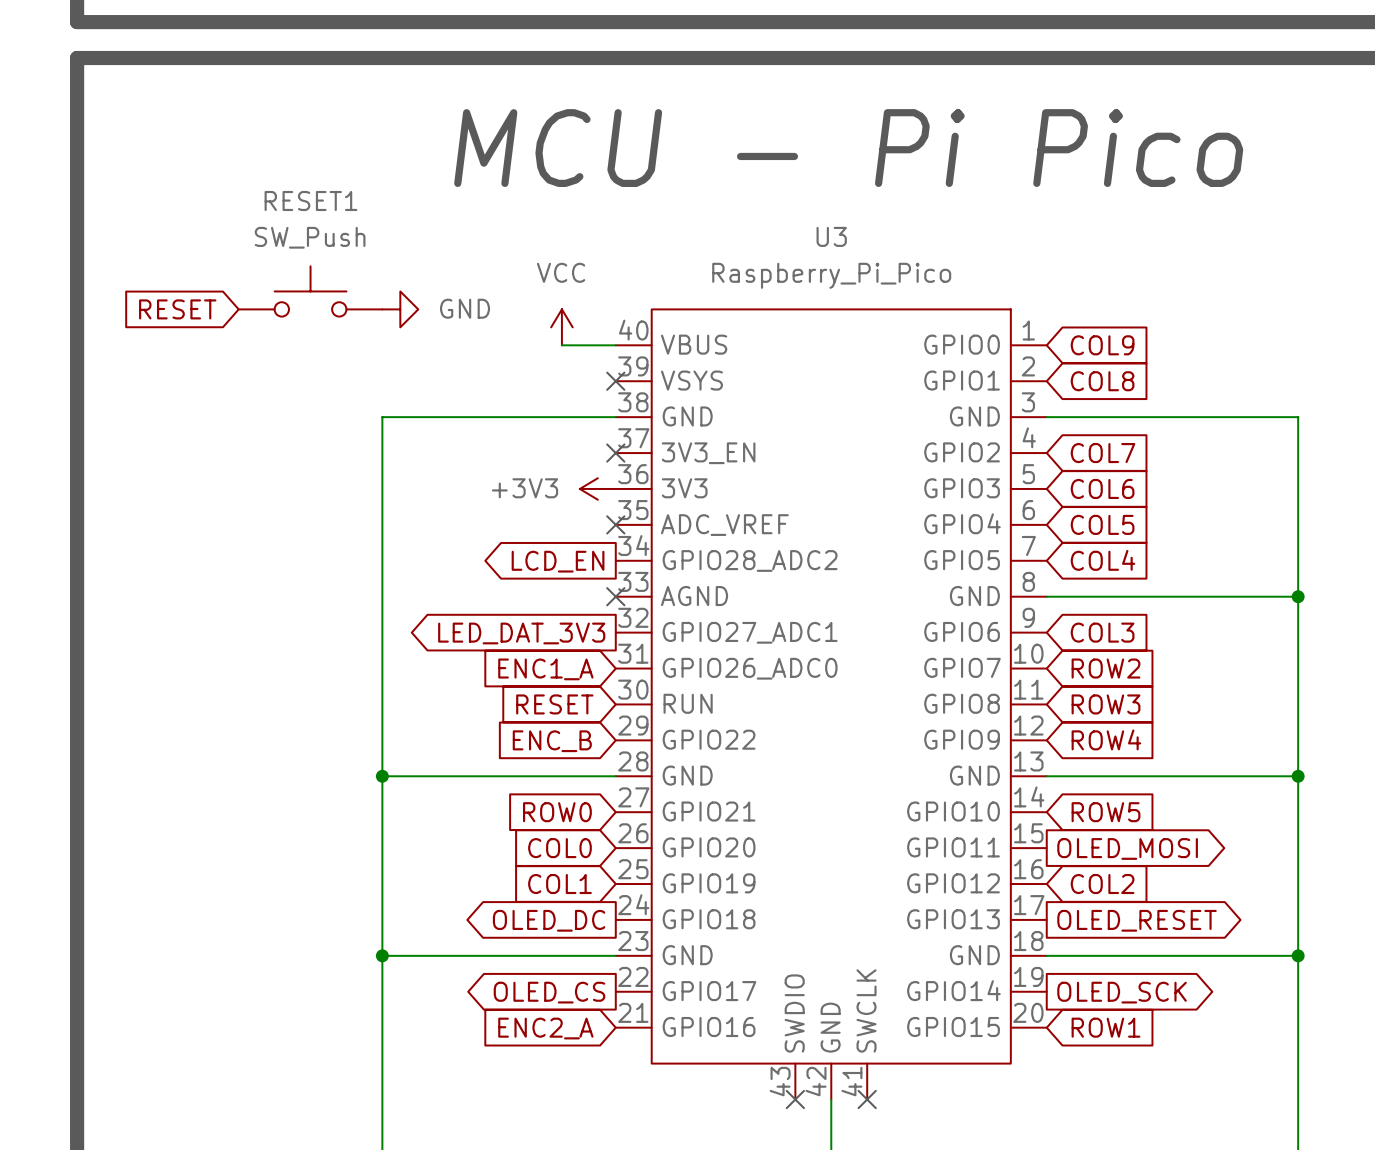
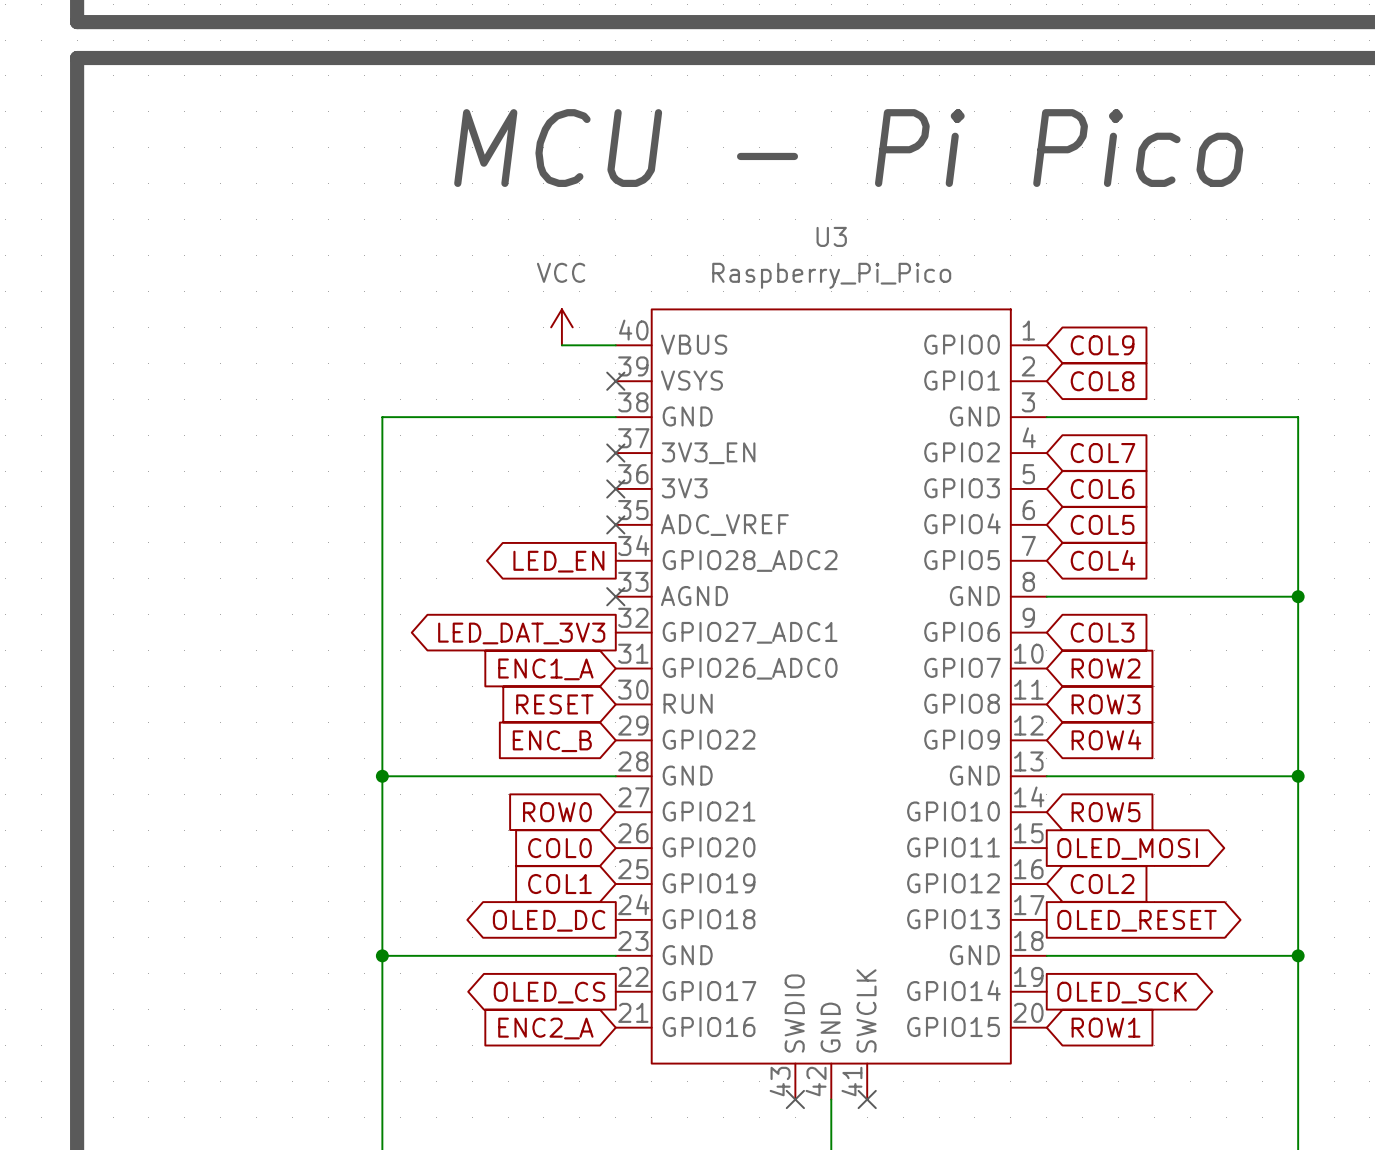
RESET1: SW_Push (310, 291) -> none
global label: RESET (177, 309) -> none
power symbol: GND (400, 309) -> none
power symbol: +3V3 (597, 488) -> none
no-connect mark: none -> (615, 488)
global label: LCD_EN (558, 561) -> LED_EN (558, 561)

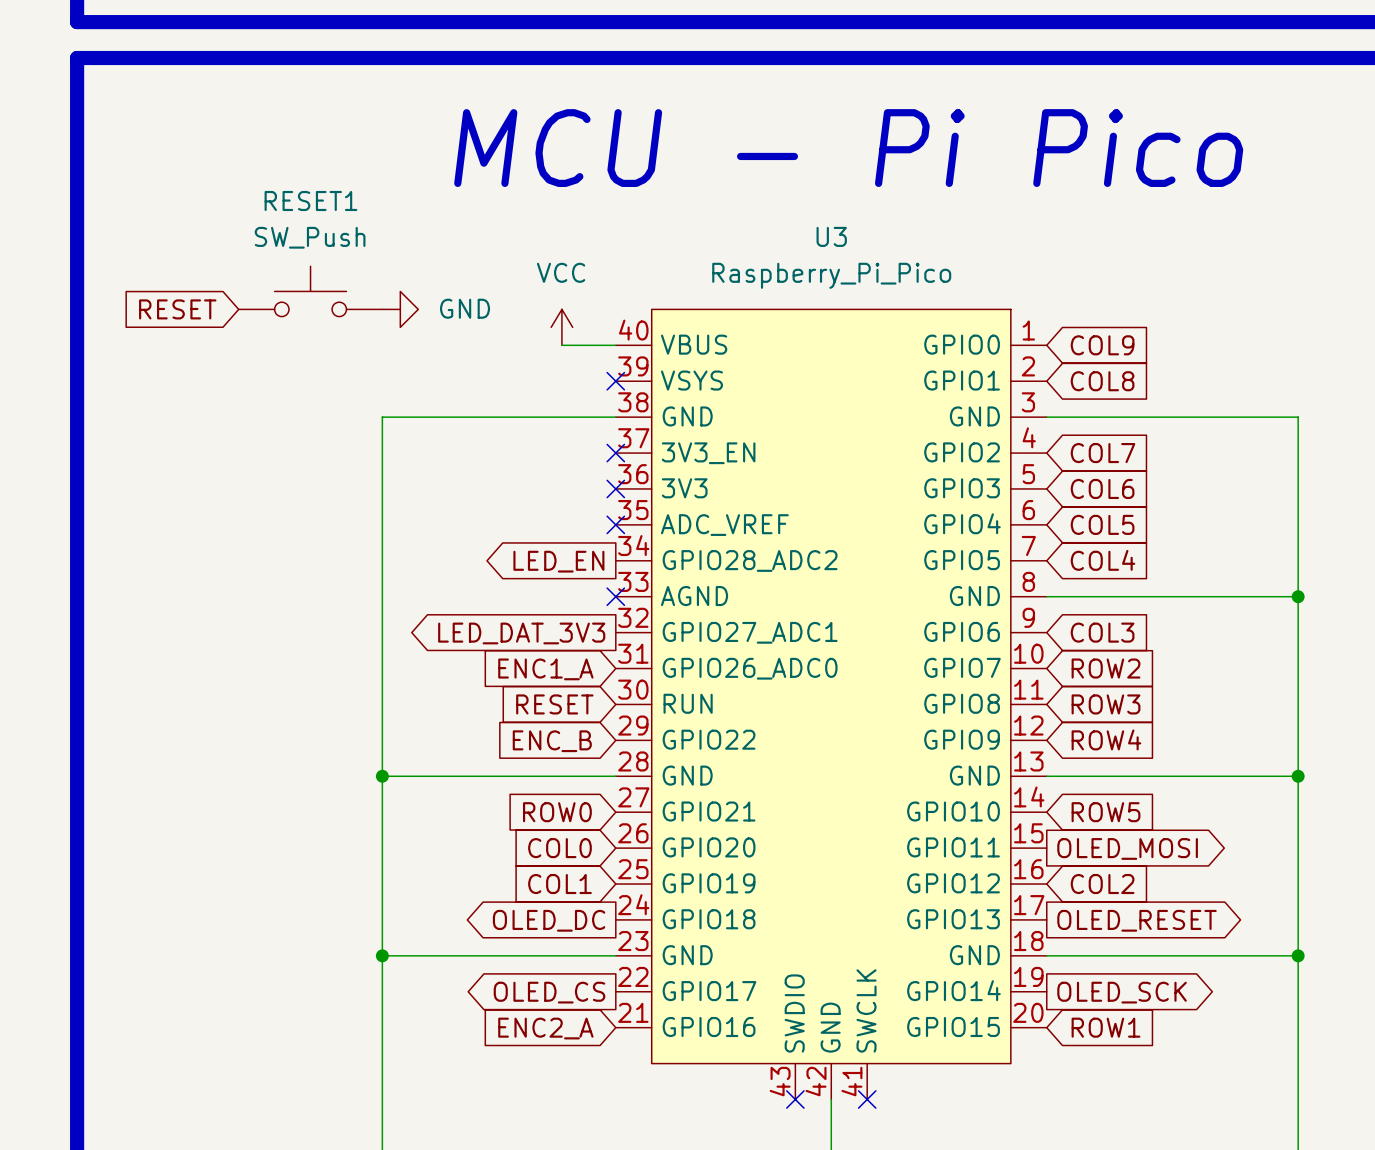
RESET1: none -> SW_Push (310, 291)
global label: none -> RESET (177, 309)
power symbol: none -> GND (400, 309)

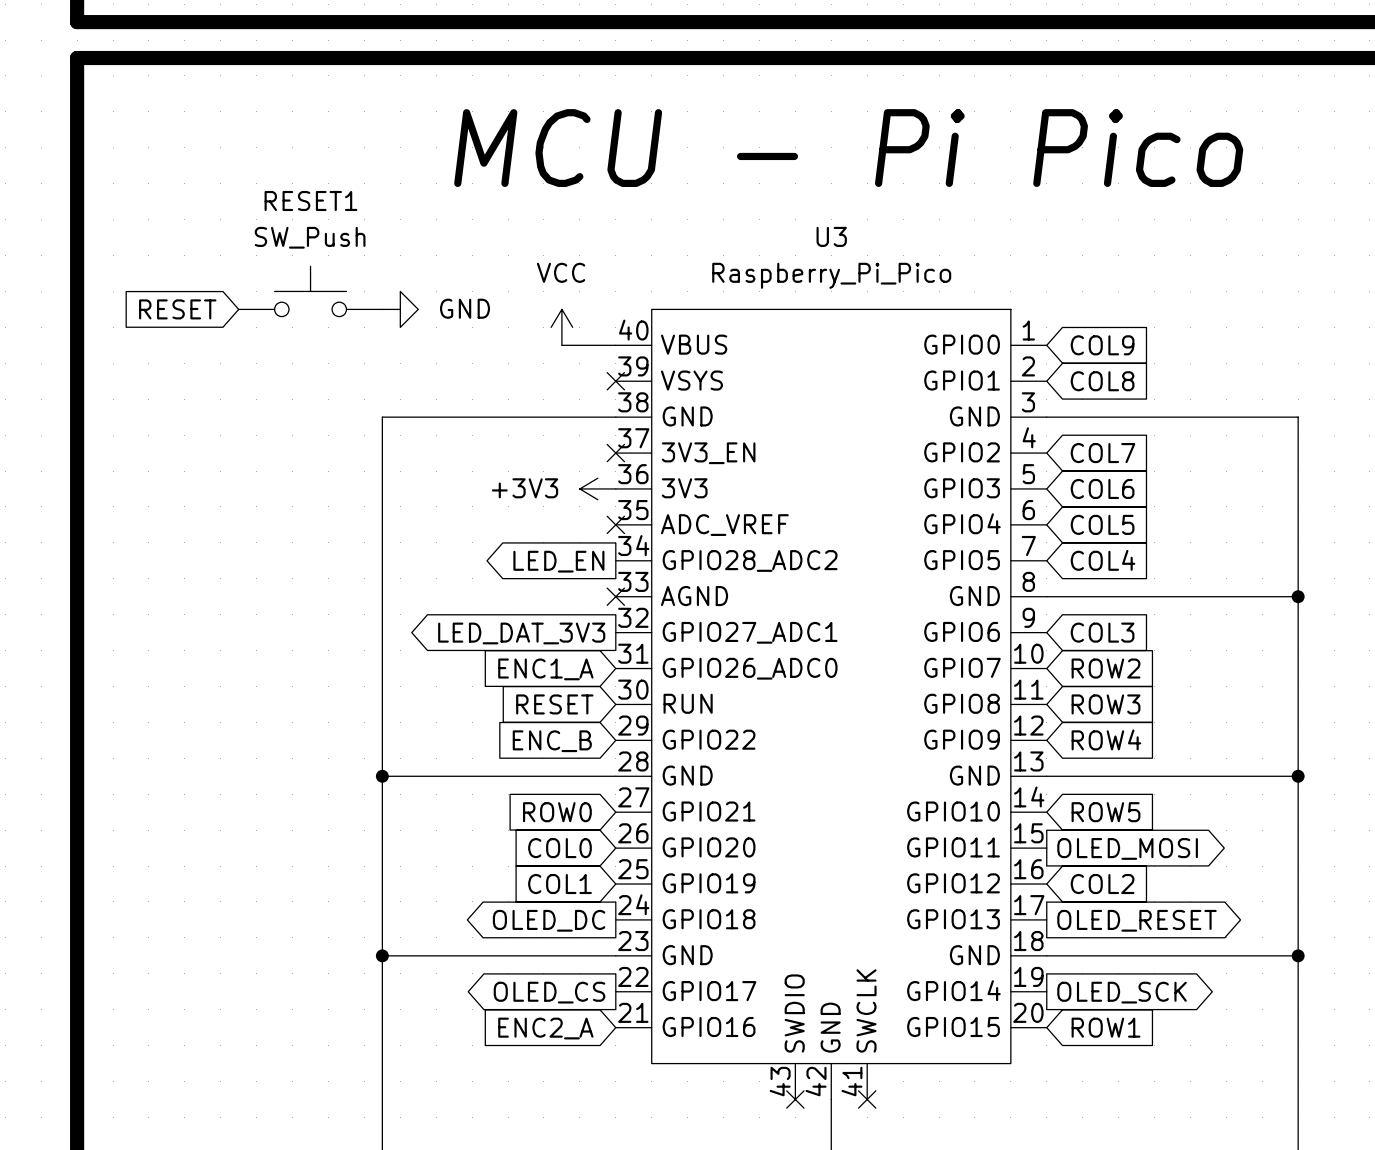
power symbol: none -> +3V3 (597, 488)
no-connect mark: (615, 488) -> none

